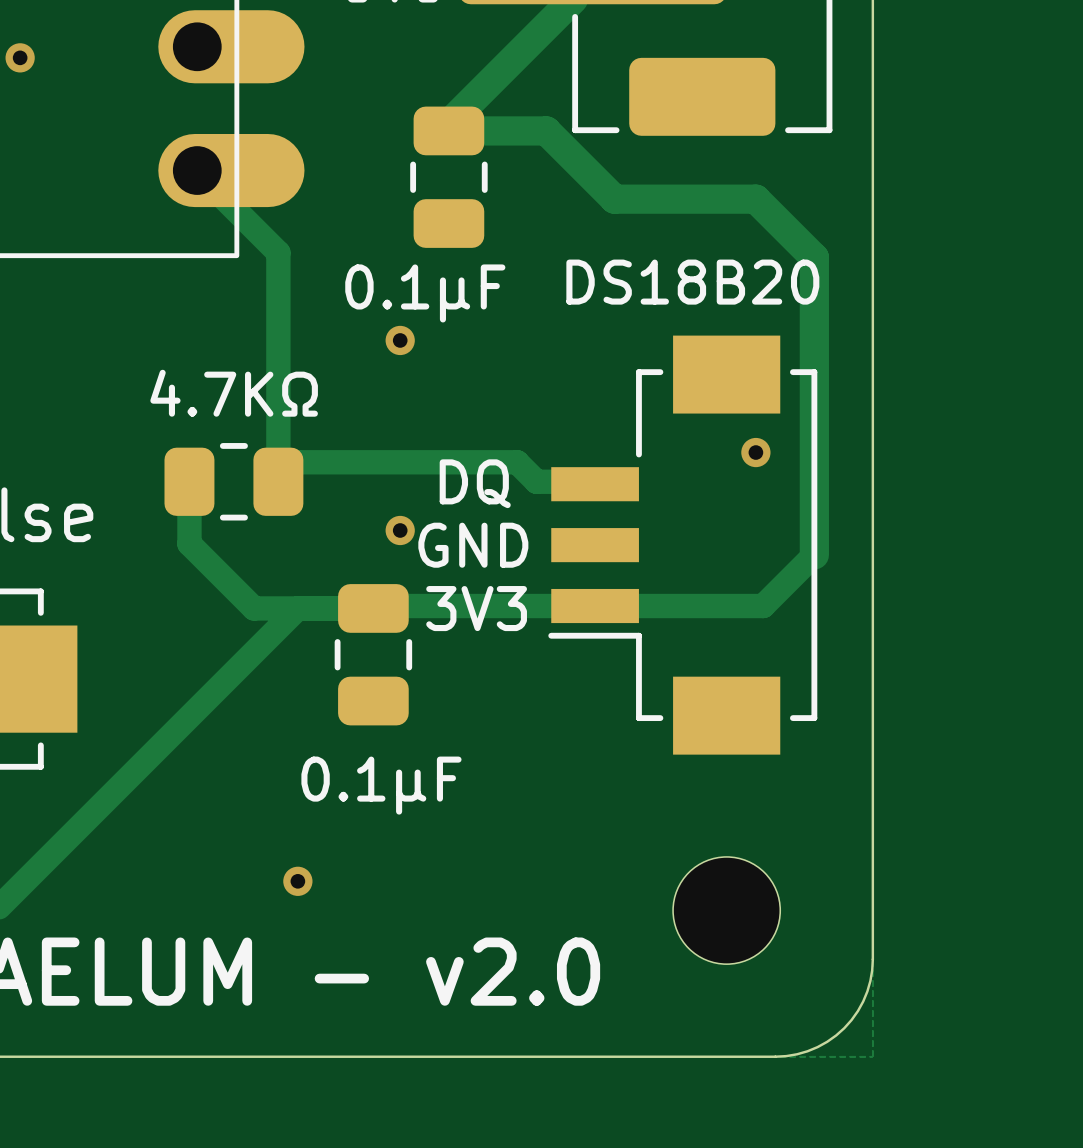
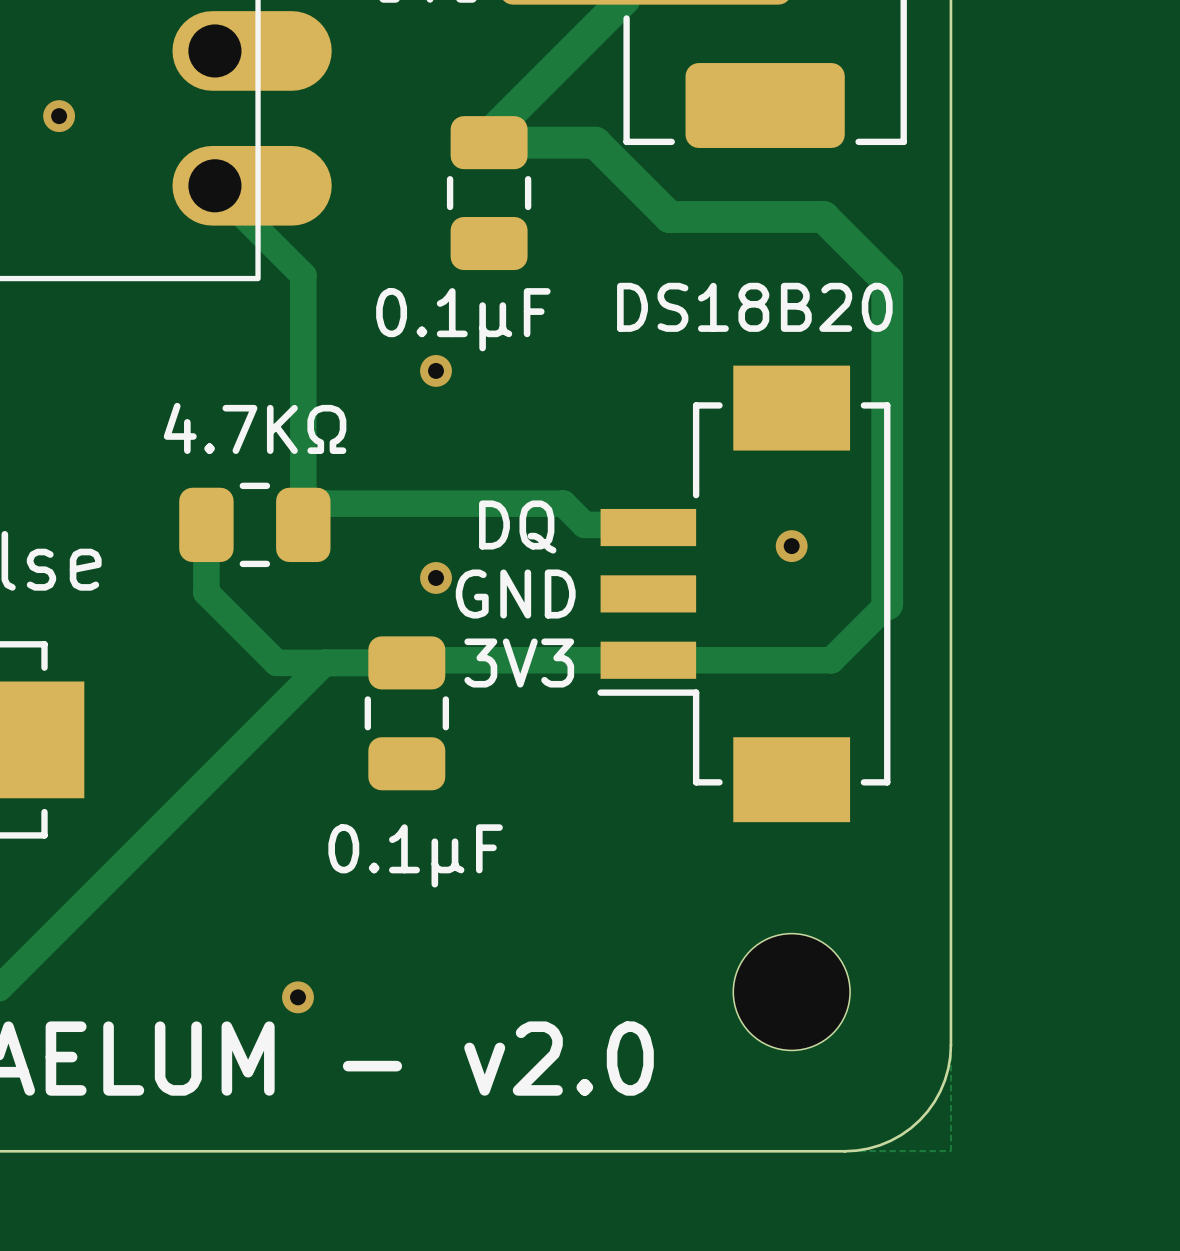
via position: (20, 57) -> (59, 116)
via position: (755, 452) -> (791, 546)
via position: (297, 881) -> (297, 997)

